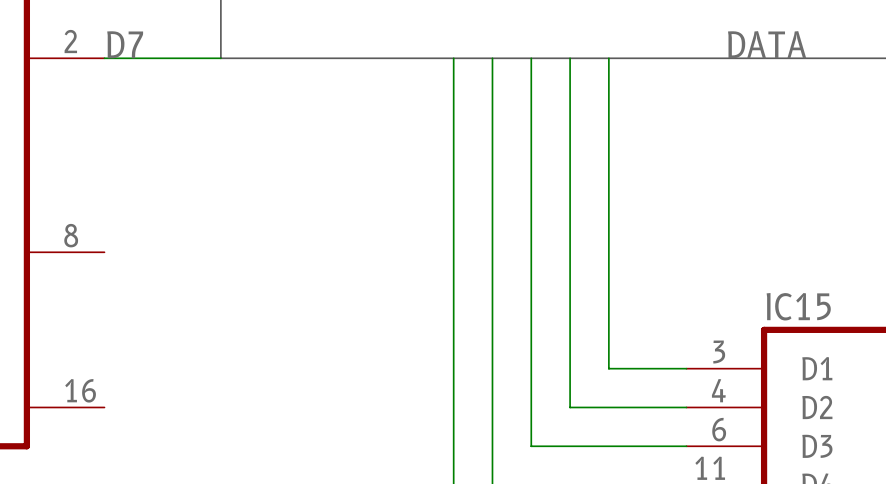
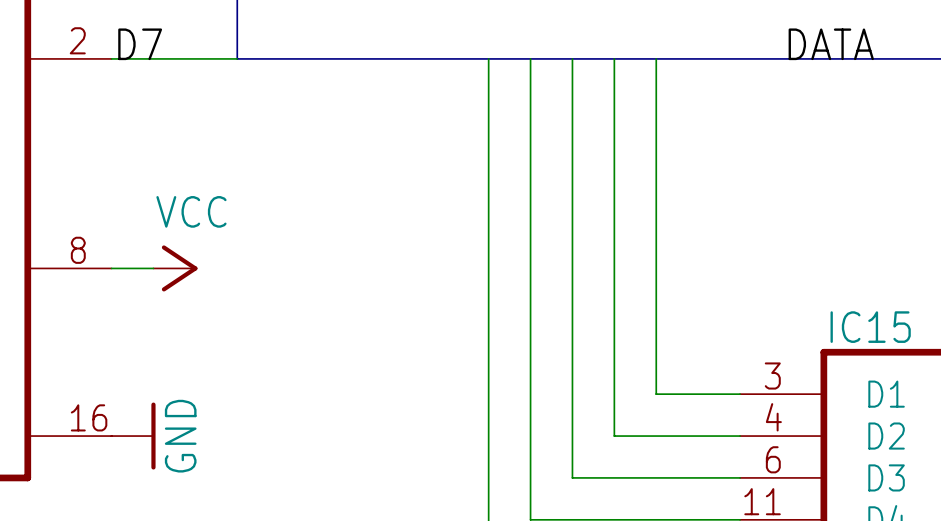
wire: none -> (111, 268) (153, 268)
power symbol: none -> VCC (175, 268)
power symbol: none -> GND (133, 436)

